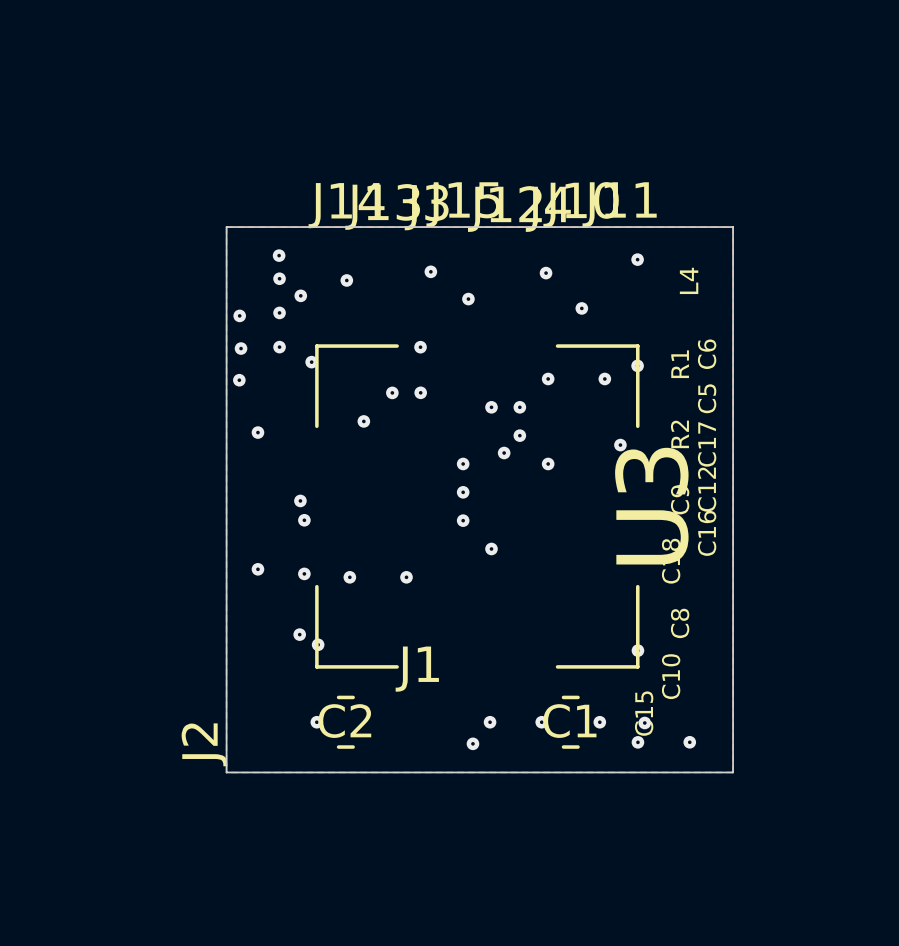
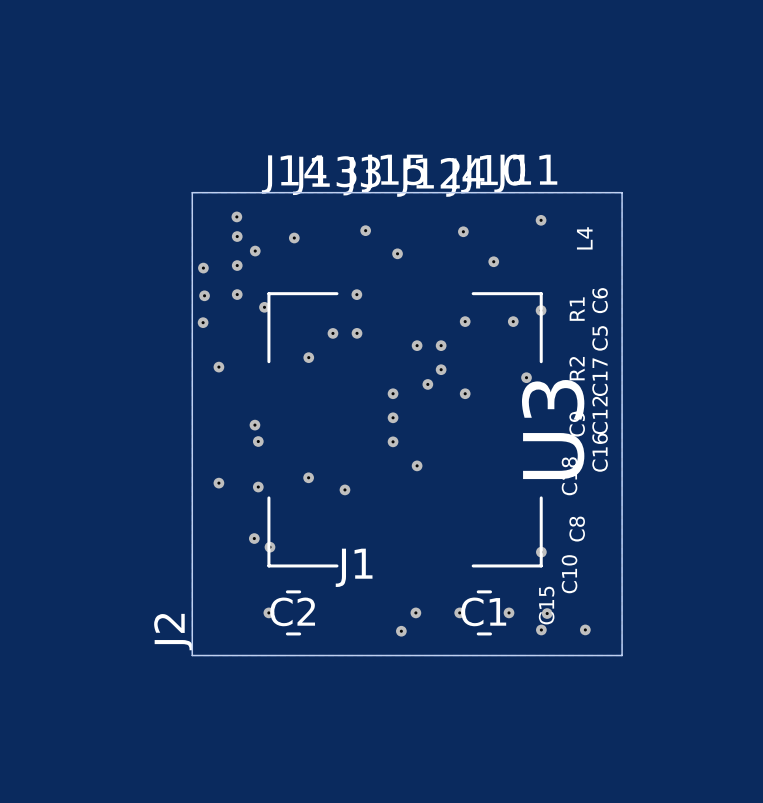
via position: (349, 577) -> (308, 477)

